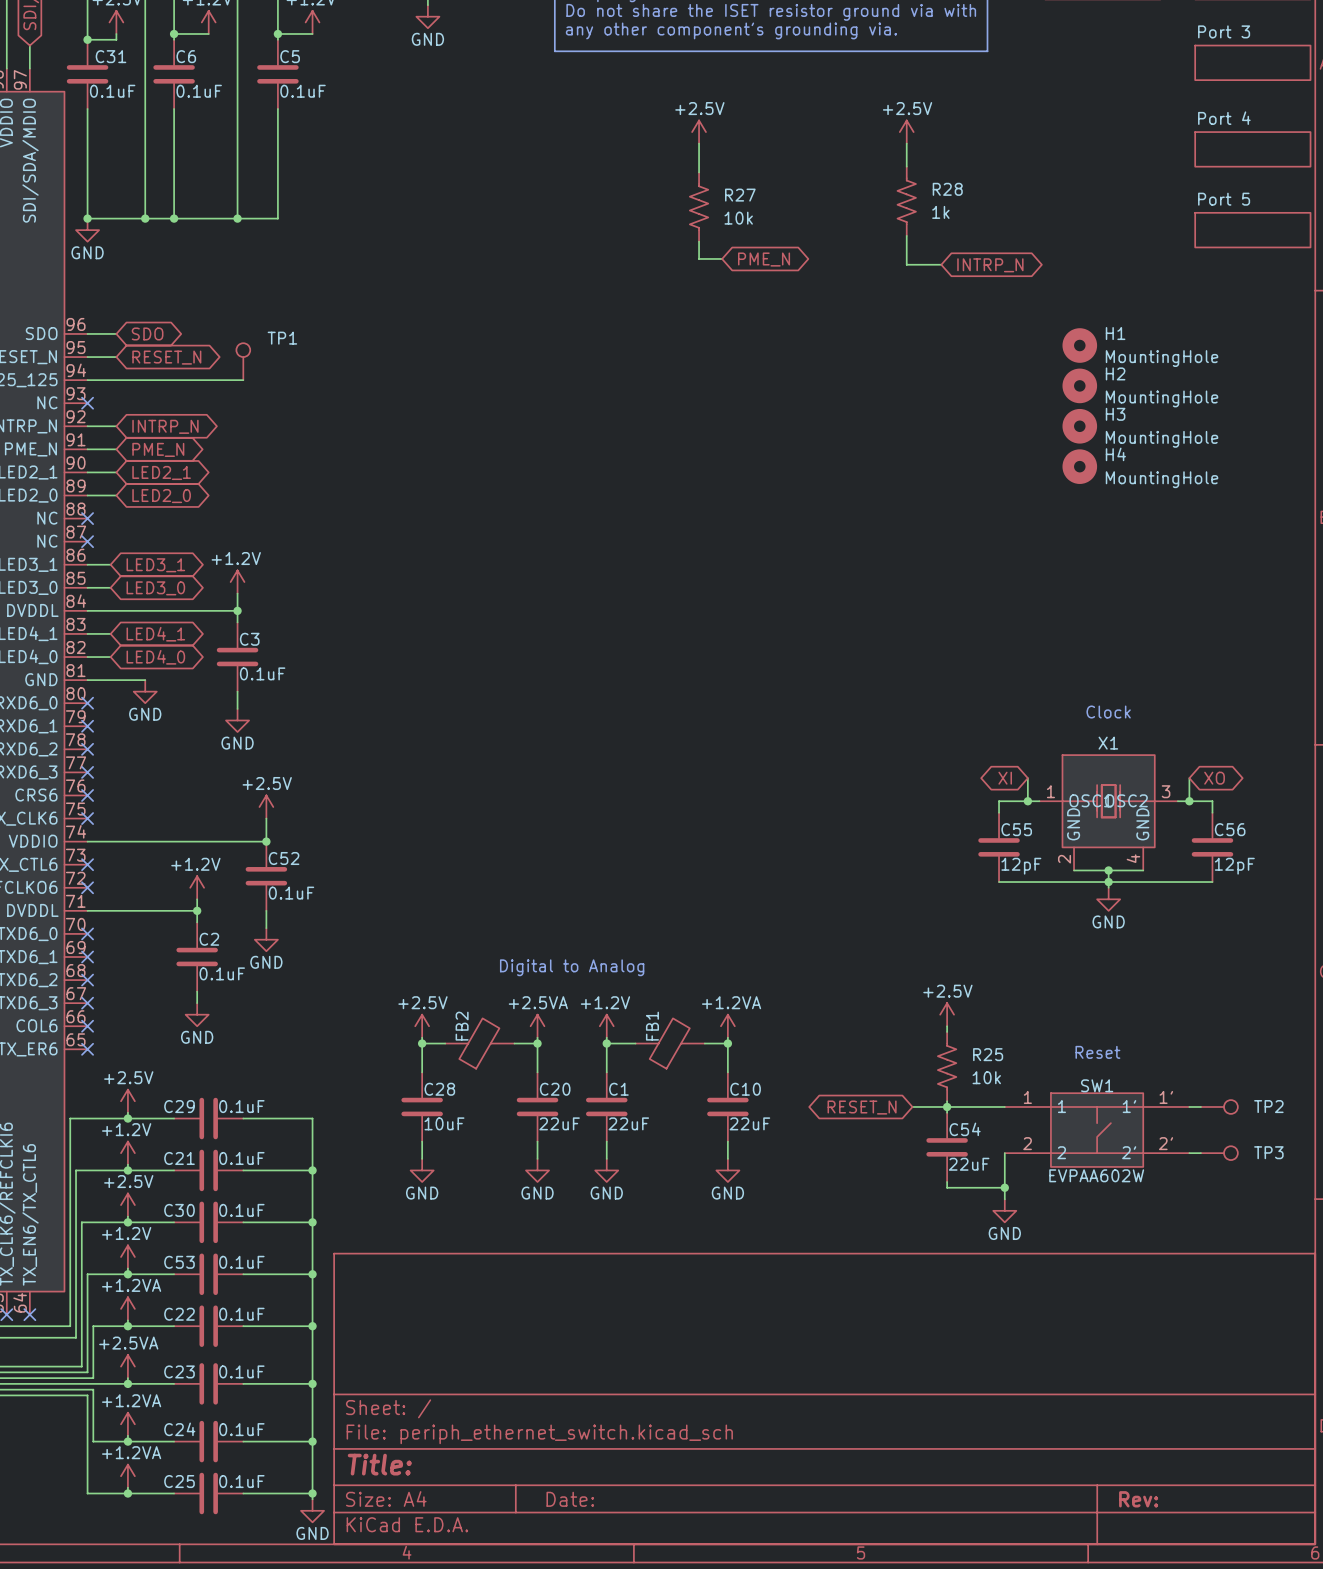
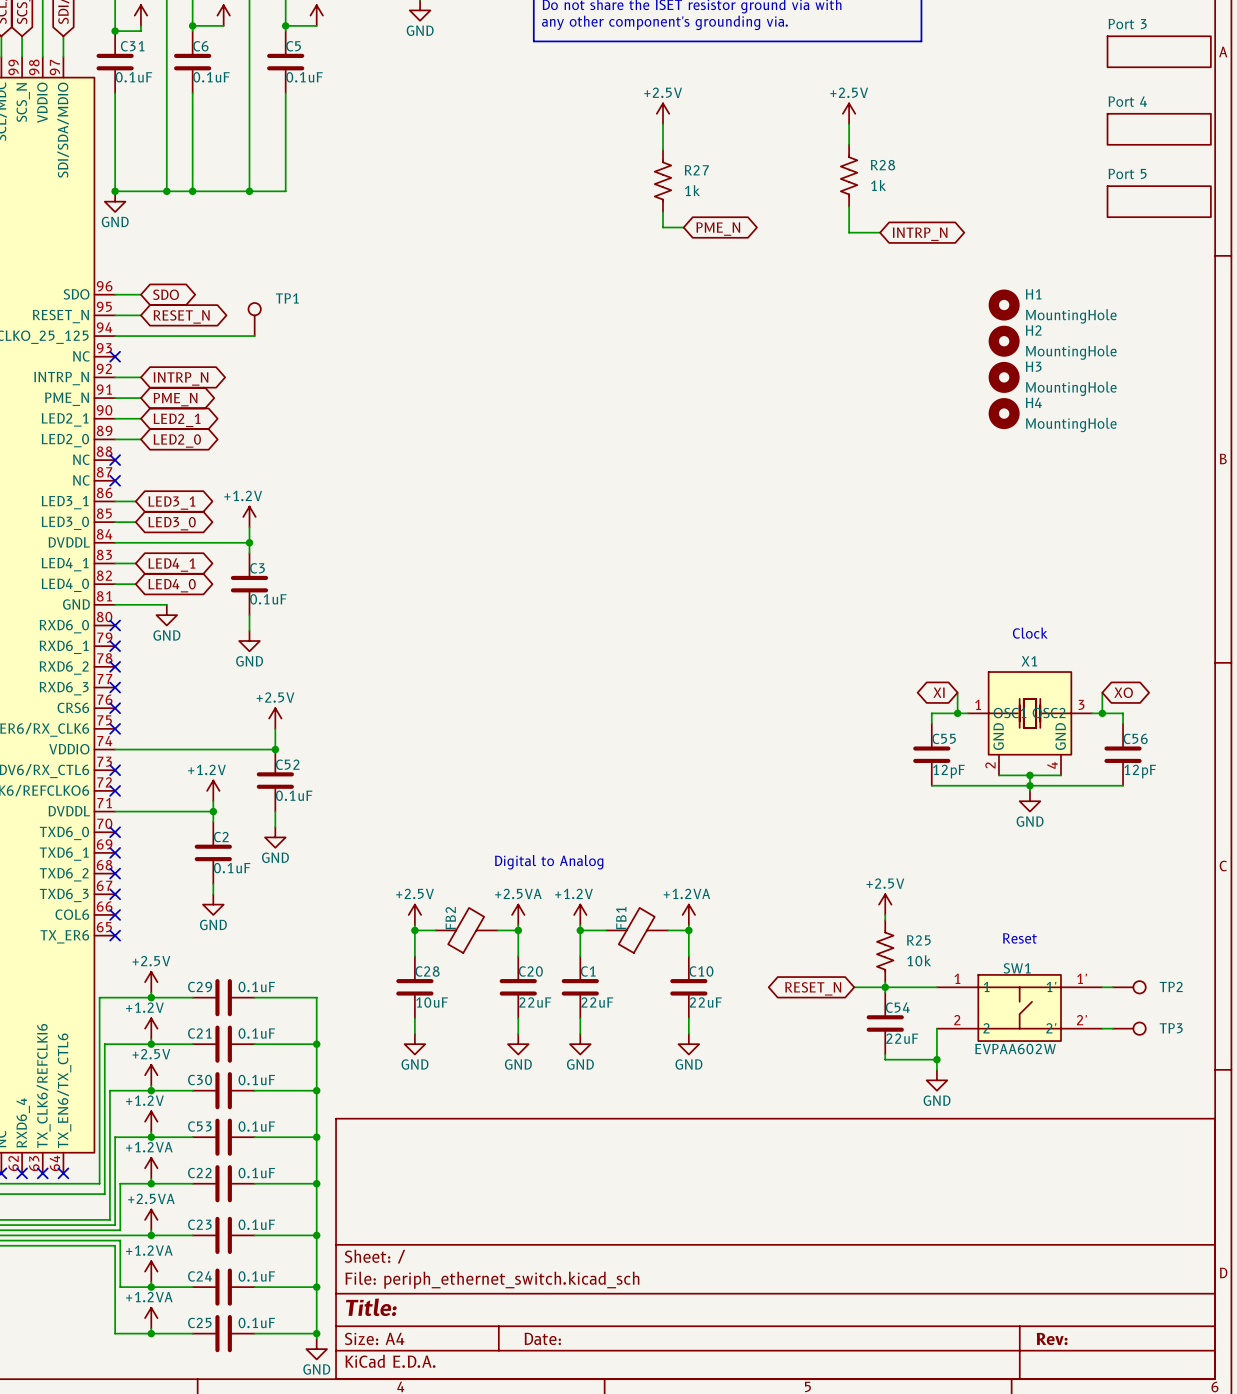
R27 value: 10k (738, 218) -> 1k (692, 190)

